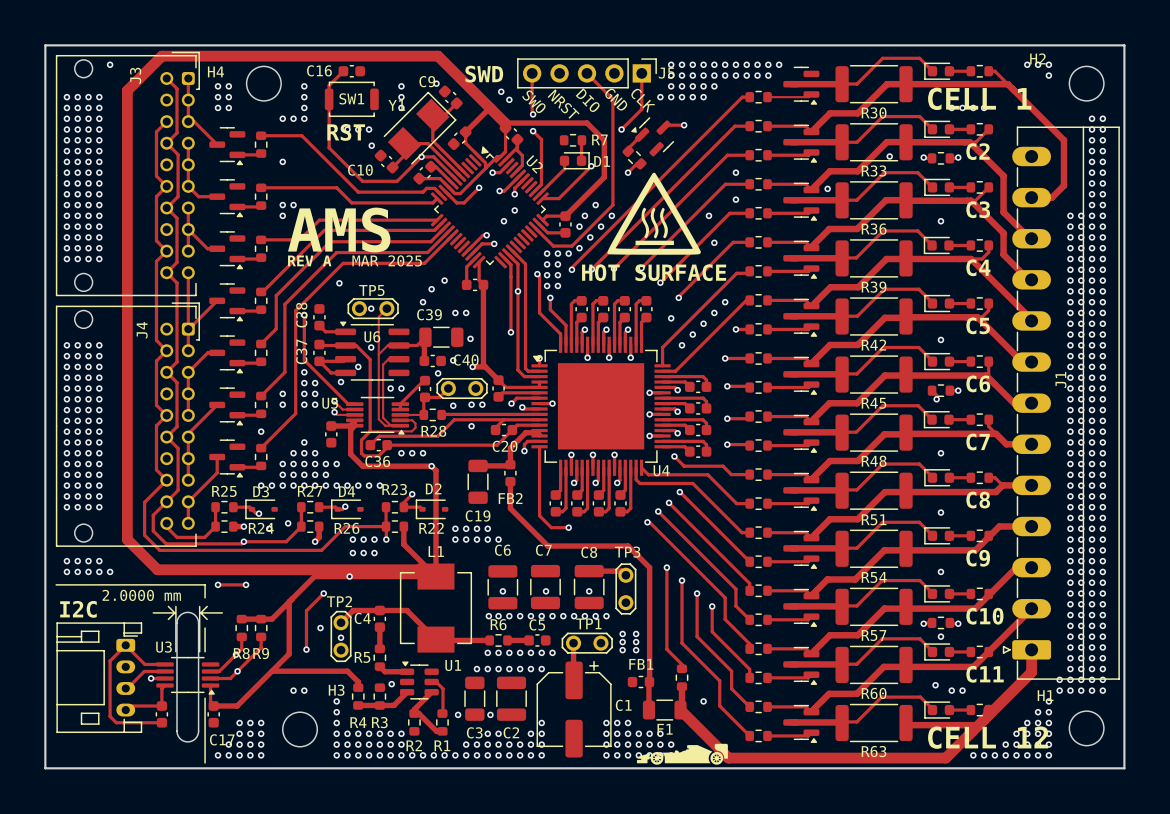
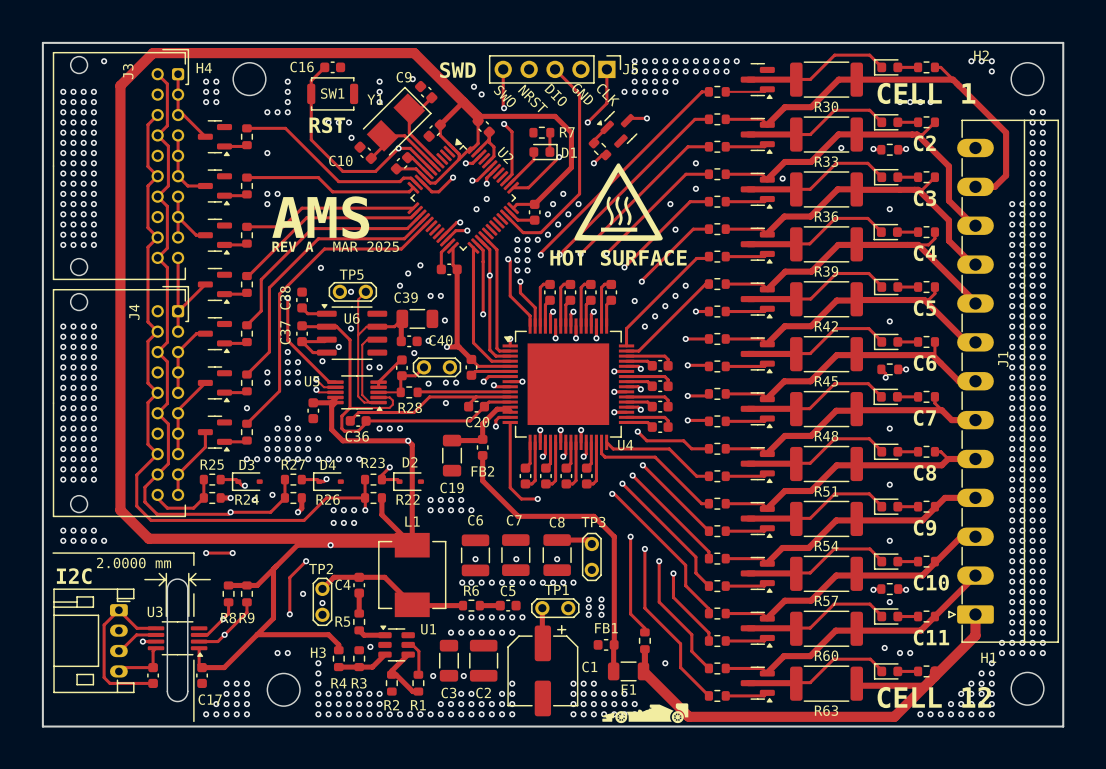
track: (539, 382) (539, 387) -> (510, 361) (491, 361) (473, 342) (473, 247)

